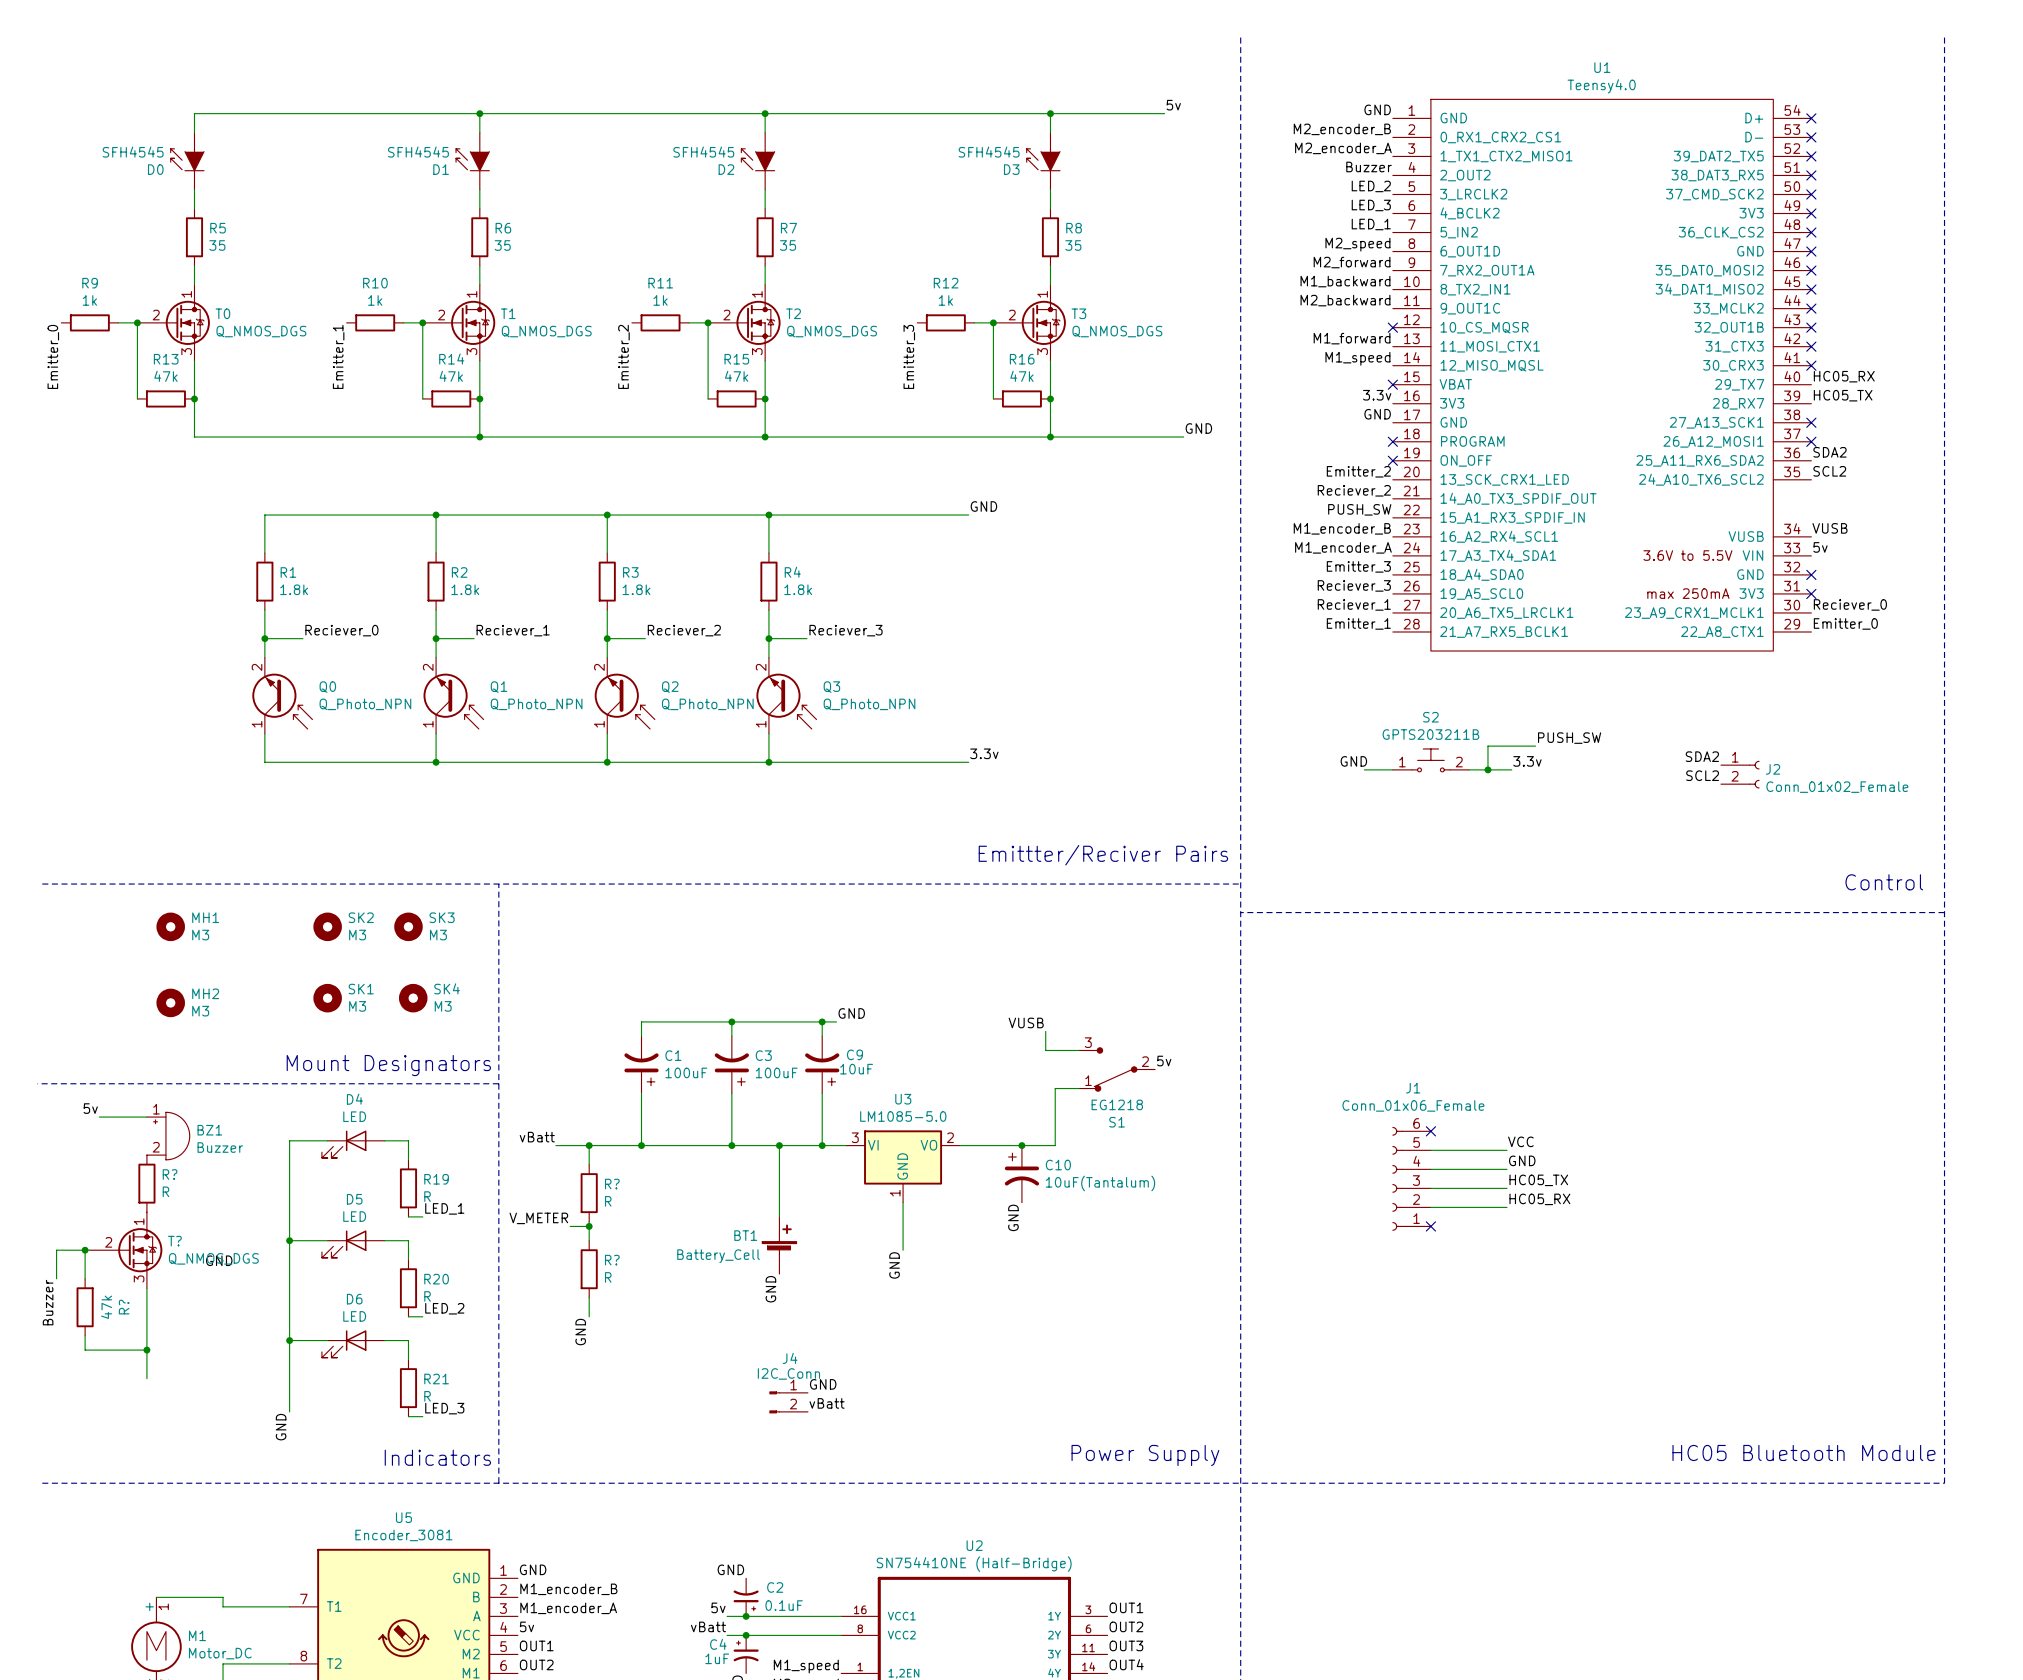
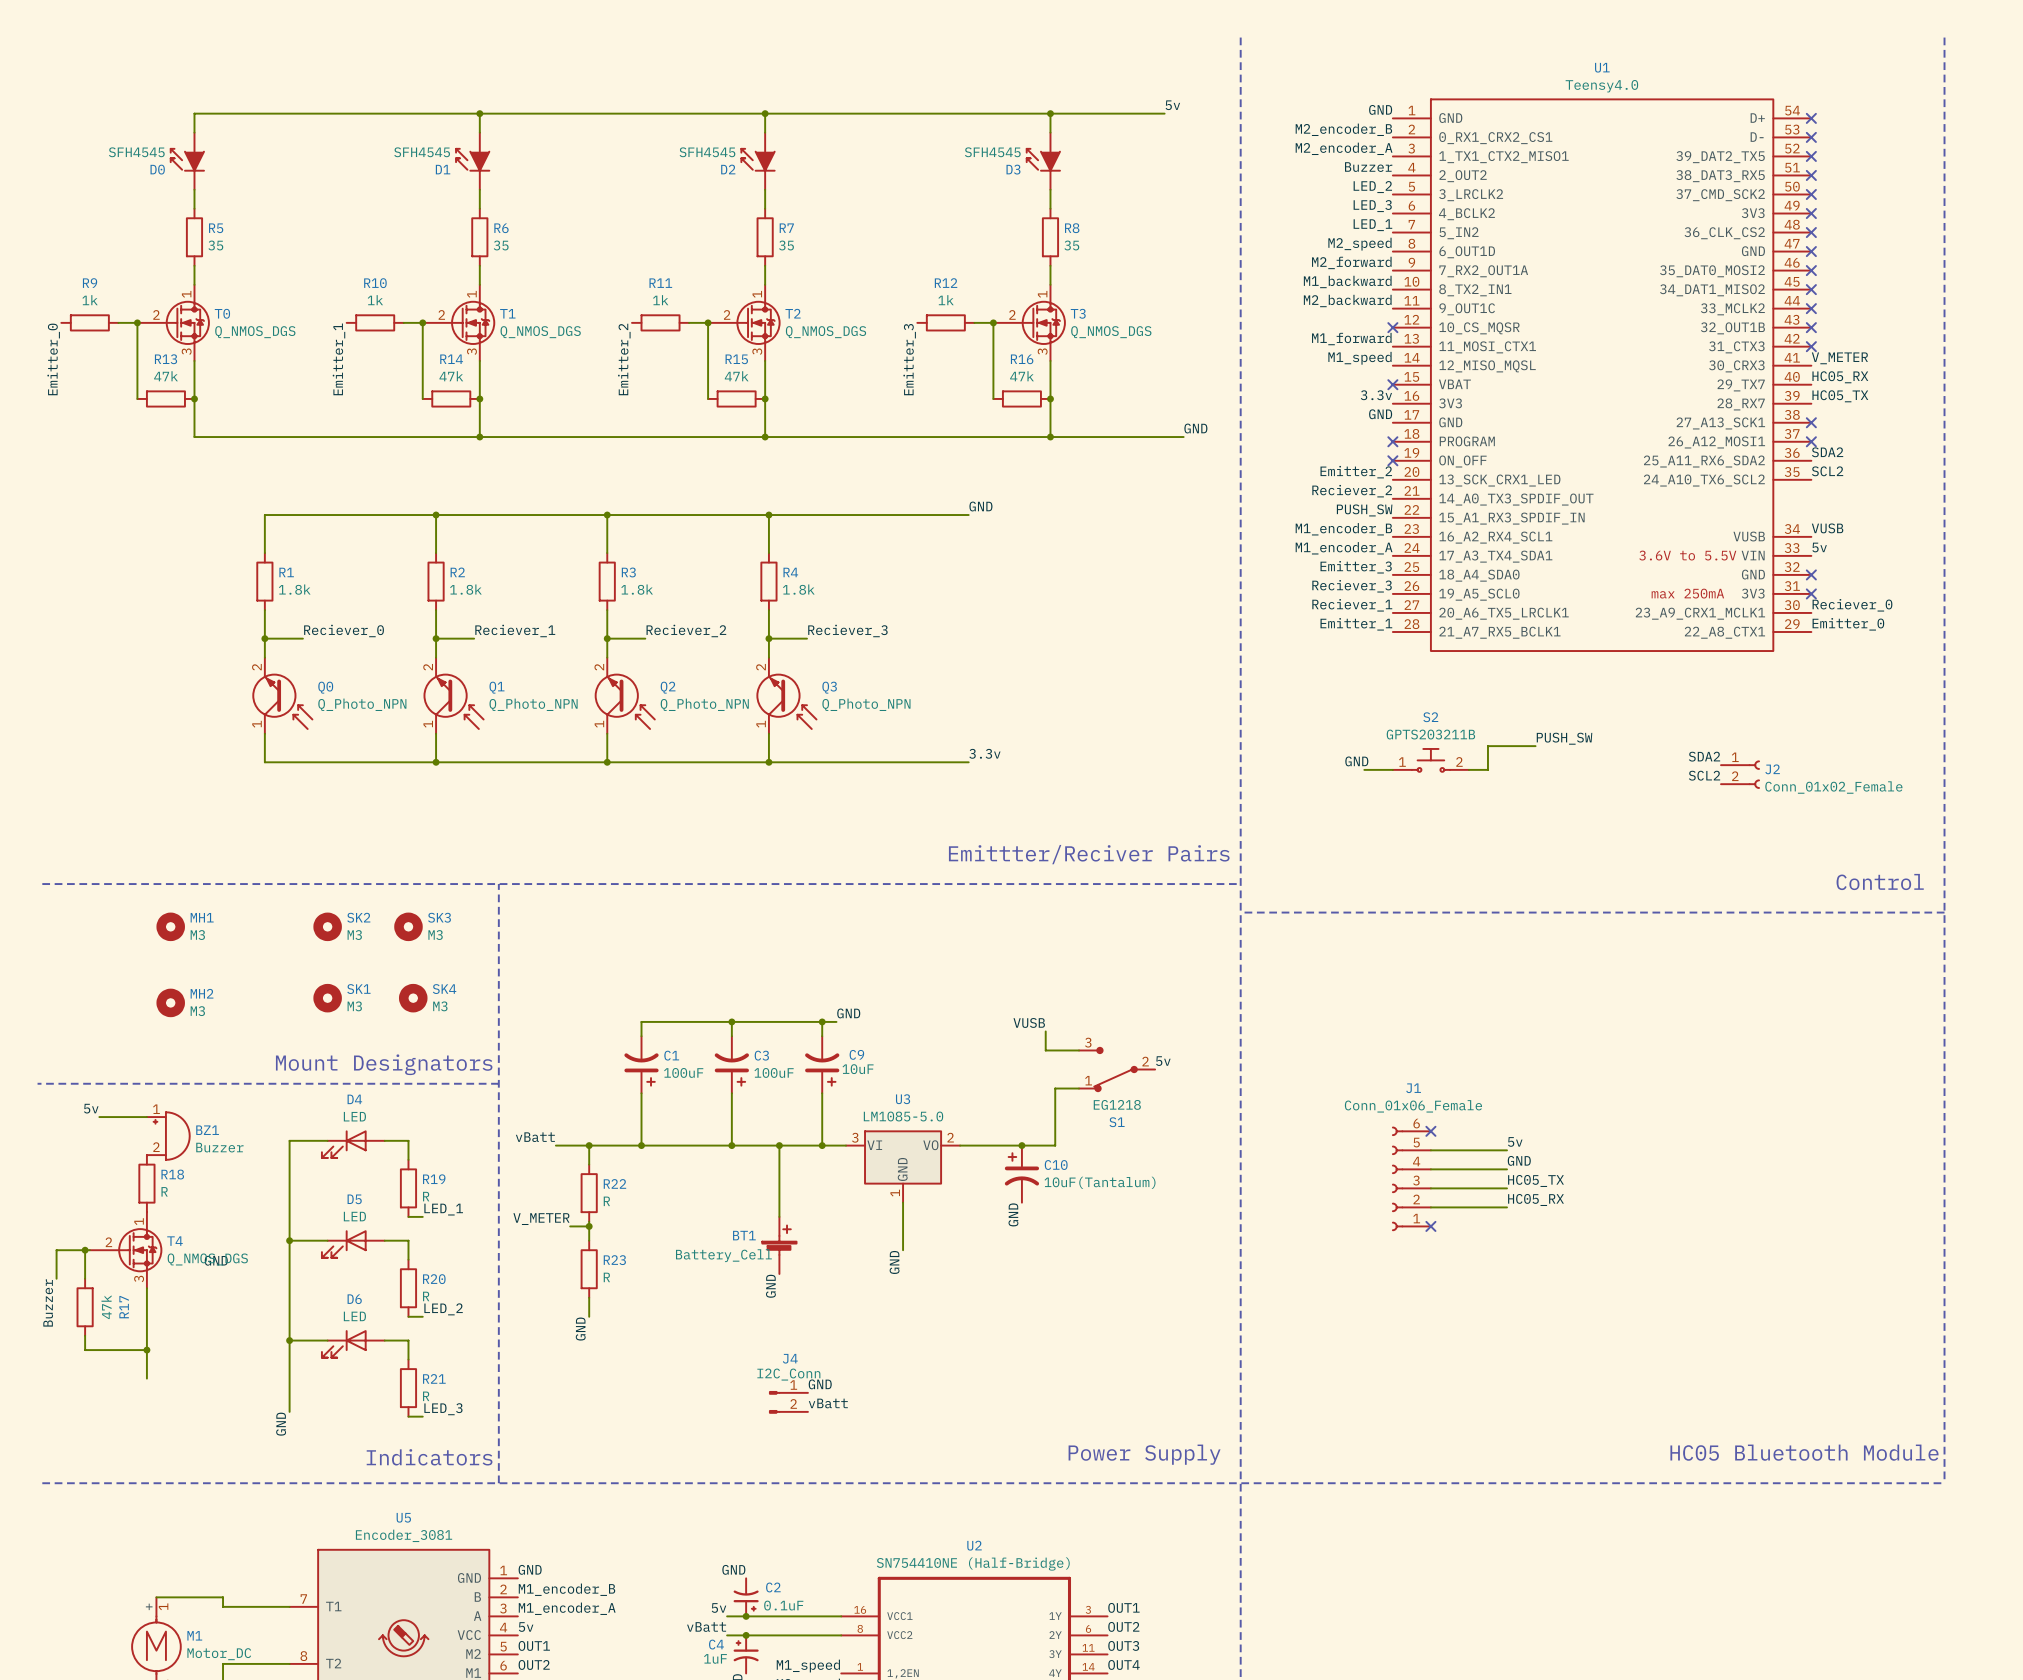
label: none -> V_METER (1839, 358)
no-connect mark: (1811, 365) -> none
label: 3.3v (1527, 761) -> none
wire: (1487, 769) (1511, 769) -> none
junction: (1487, 769) -> none
label: VCC (1520, 1141) -> 5v (1515, 1141)
R? name: R? (170, 1174) -> R18 (172, 1174)
R? name: R? (612, 1184) -> R22 (614, 1183)
T? name: T? (174, 1241) -> T4 (174, 1241)
R? name: R? (612, 1260) -> R23 (614, 1260)
R? name: R? (124, 1307) -> R17 (124, 1307)

